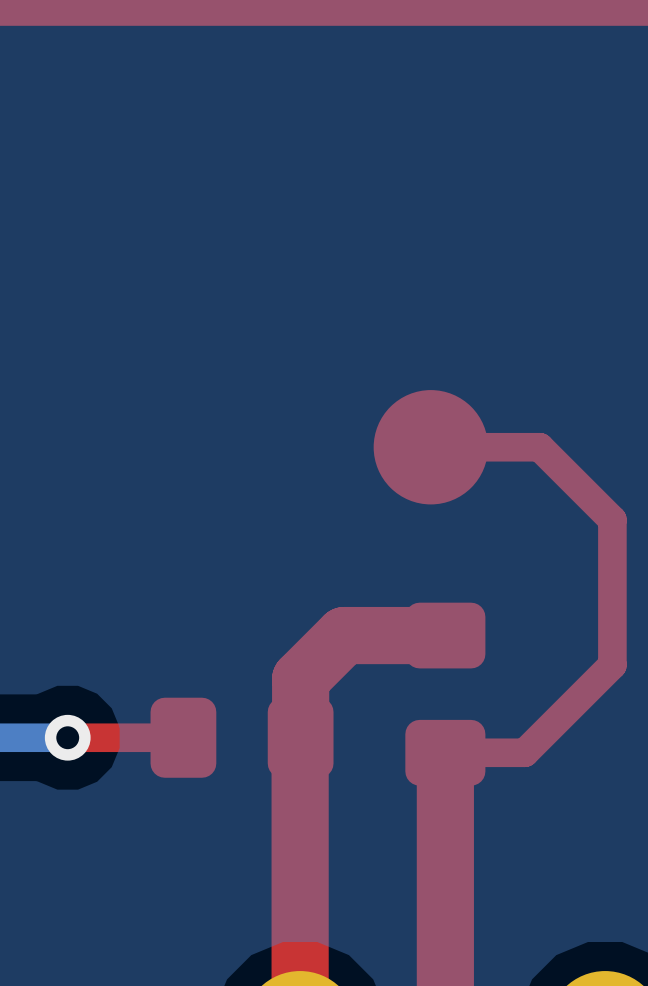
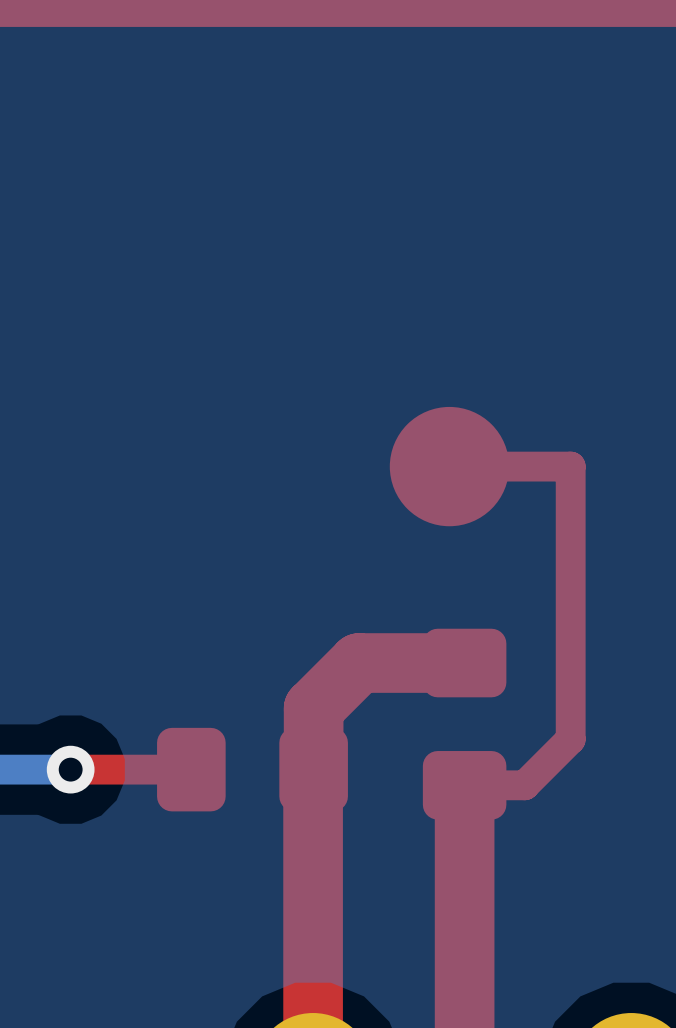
top track: (539, 447) (612, 519) (612, 665) (524, 752) (502, 752) -> (563, 466) (570, 466) (570, 739) (524, 785)

